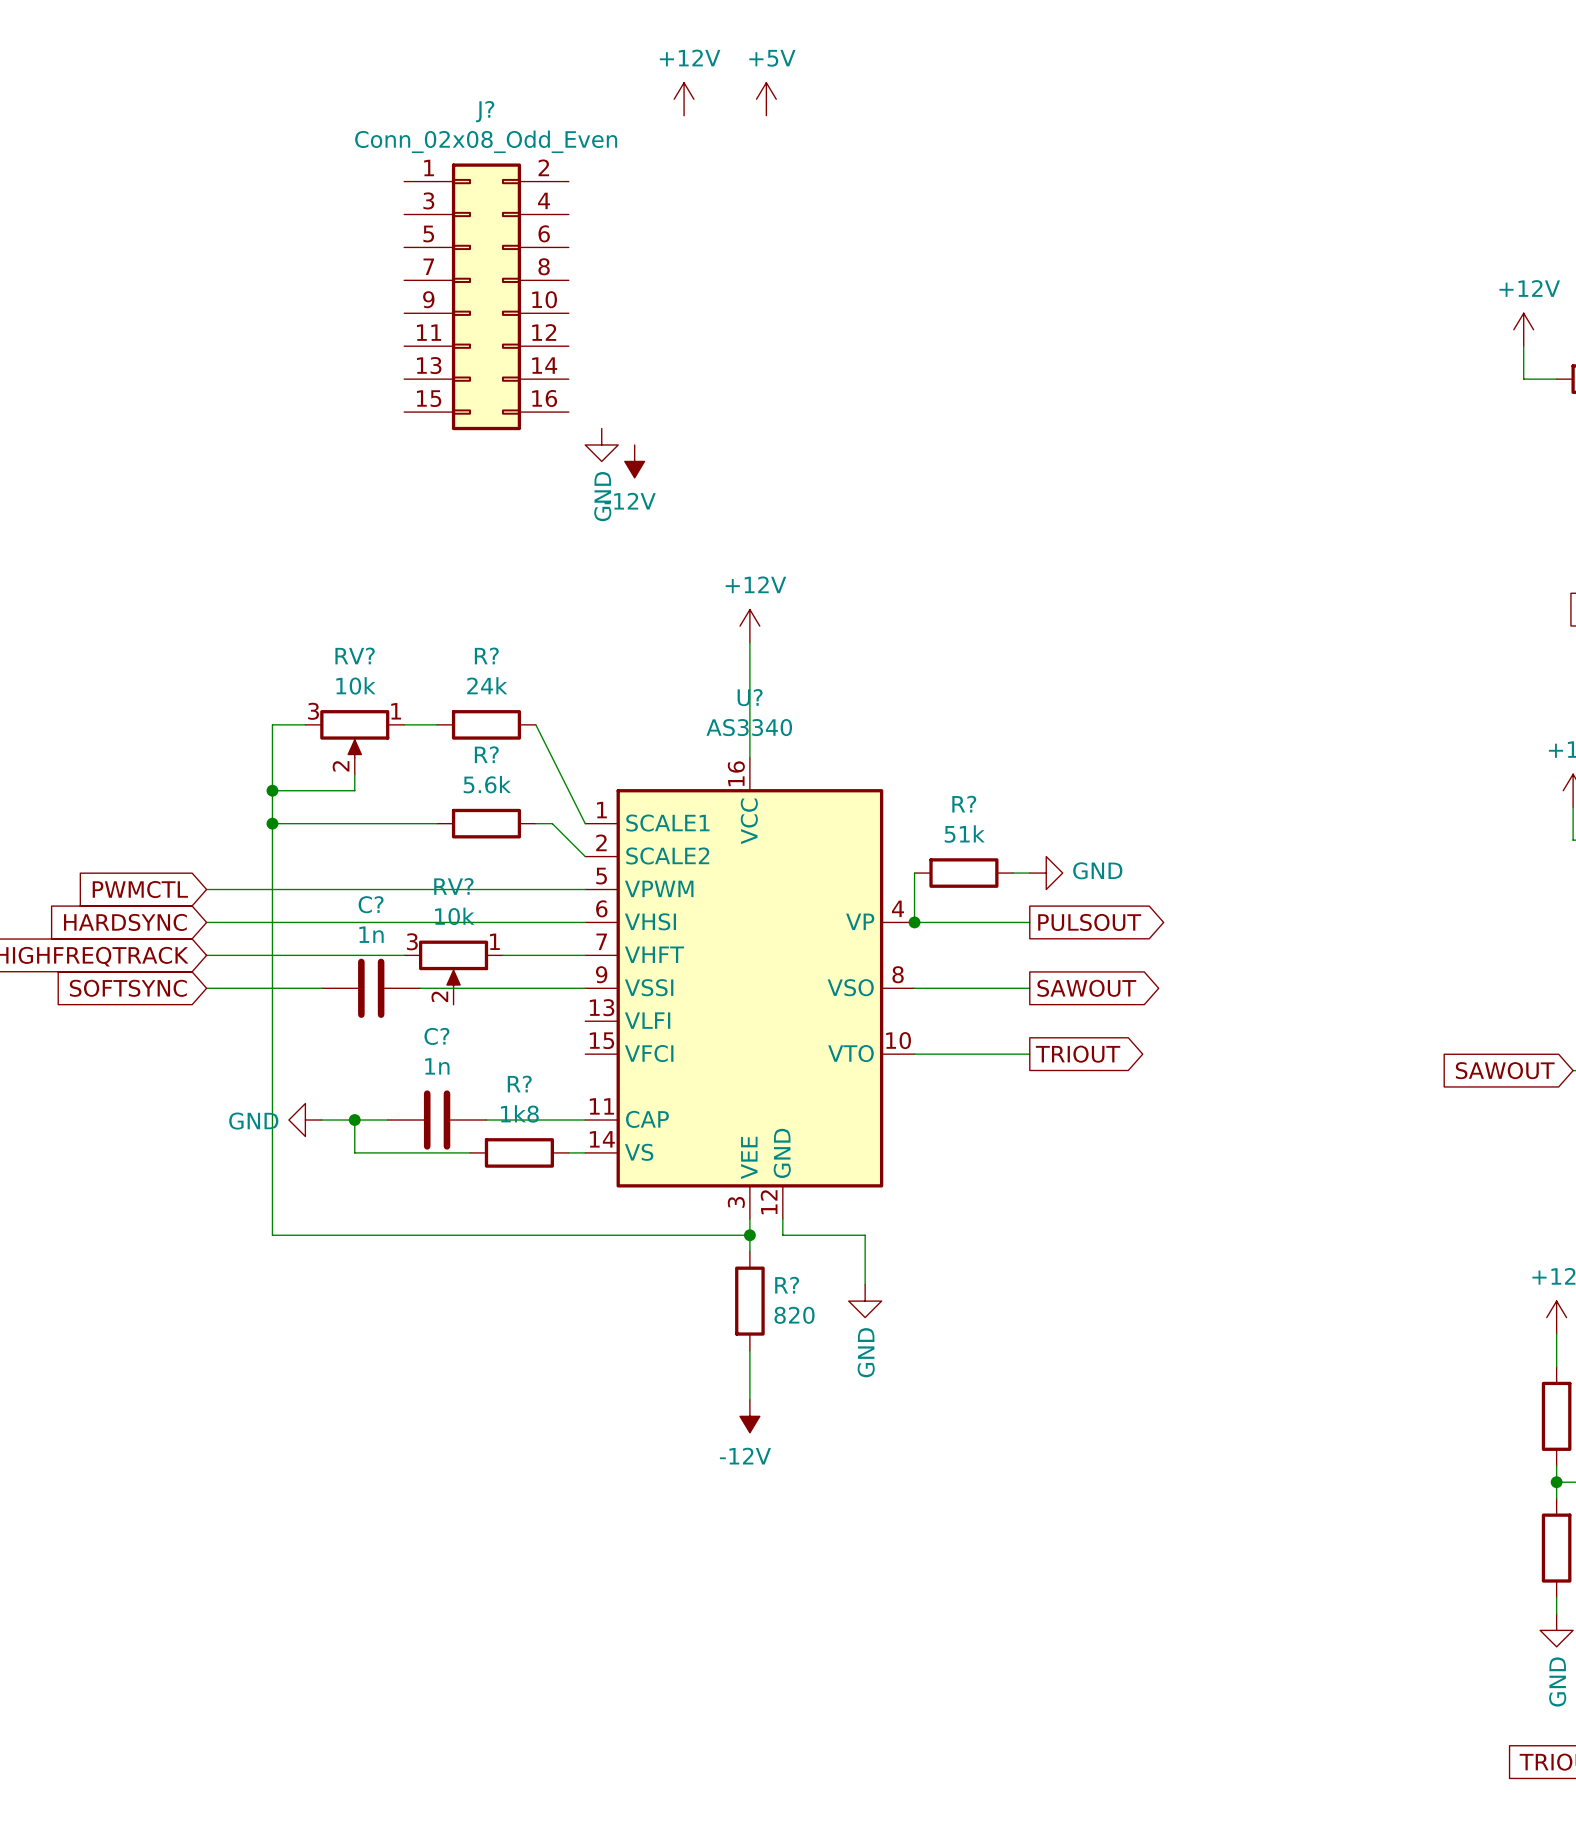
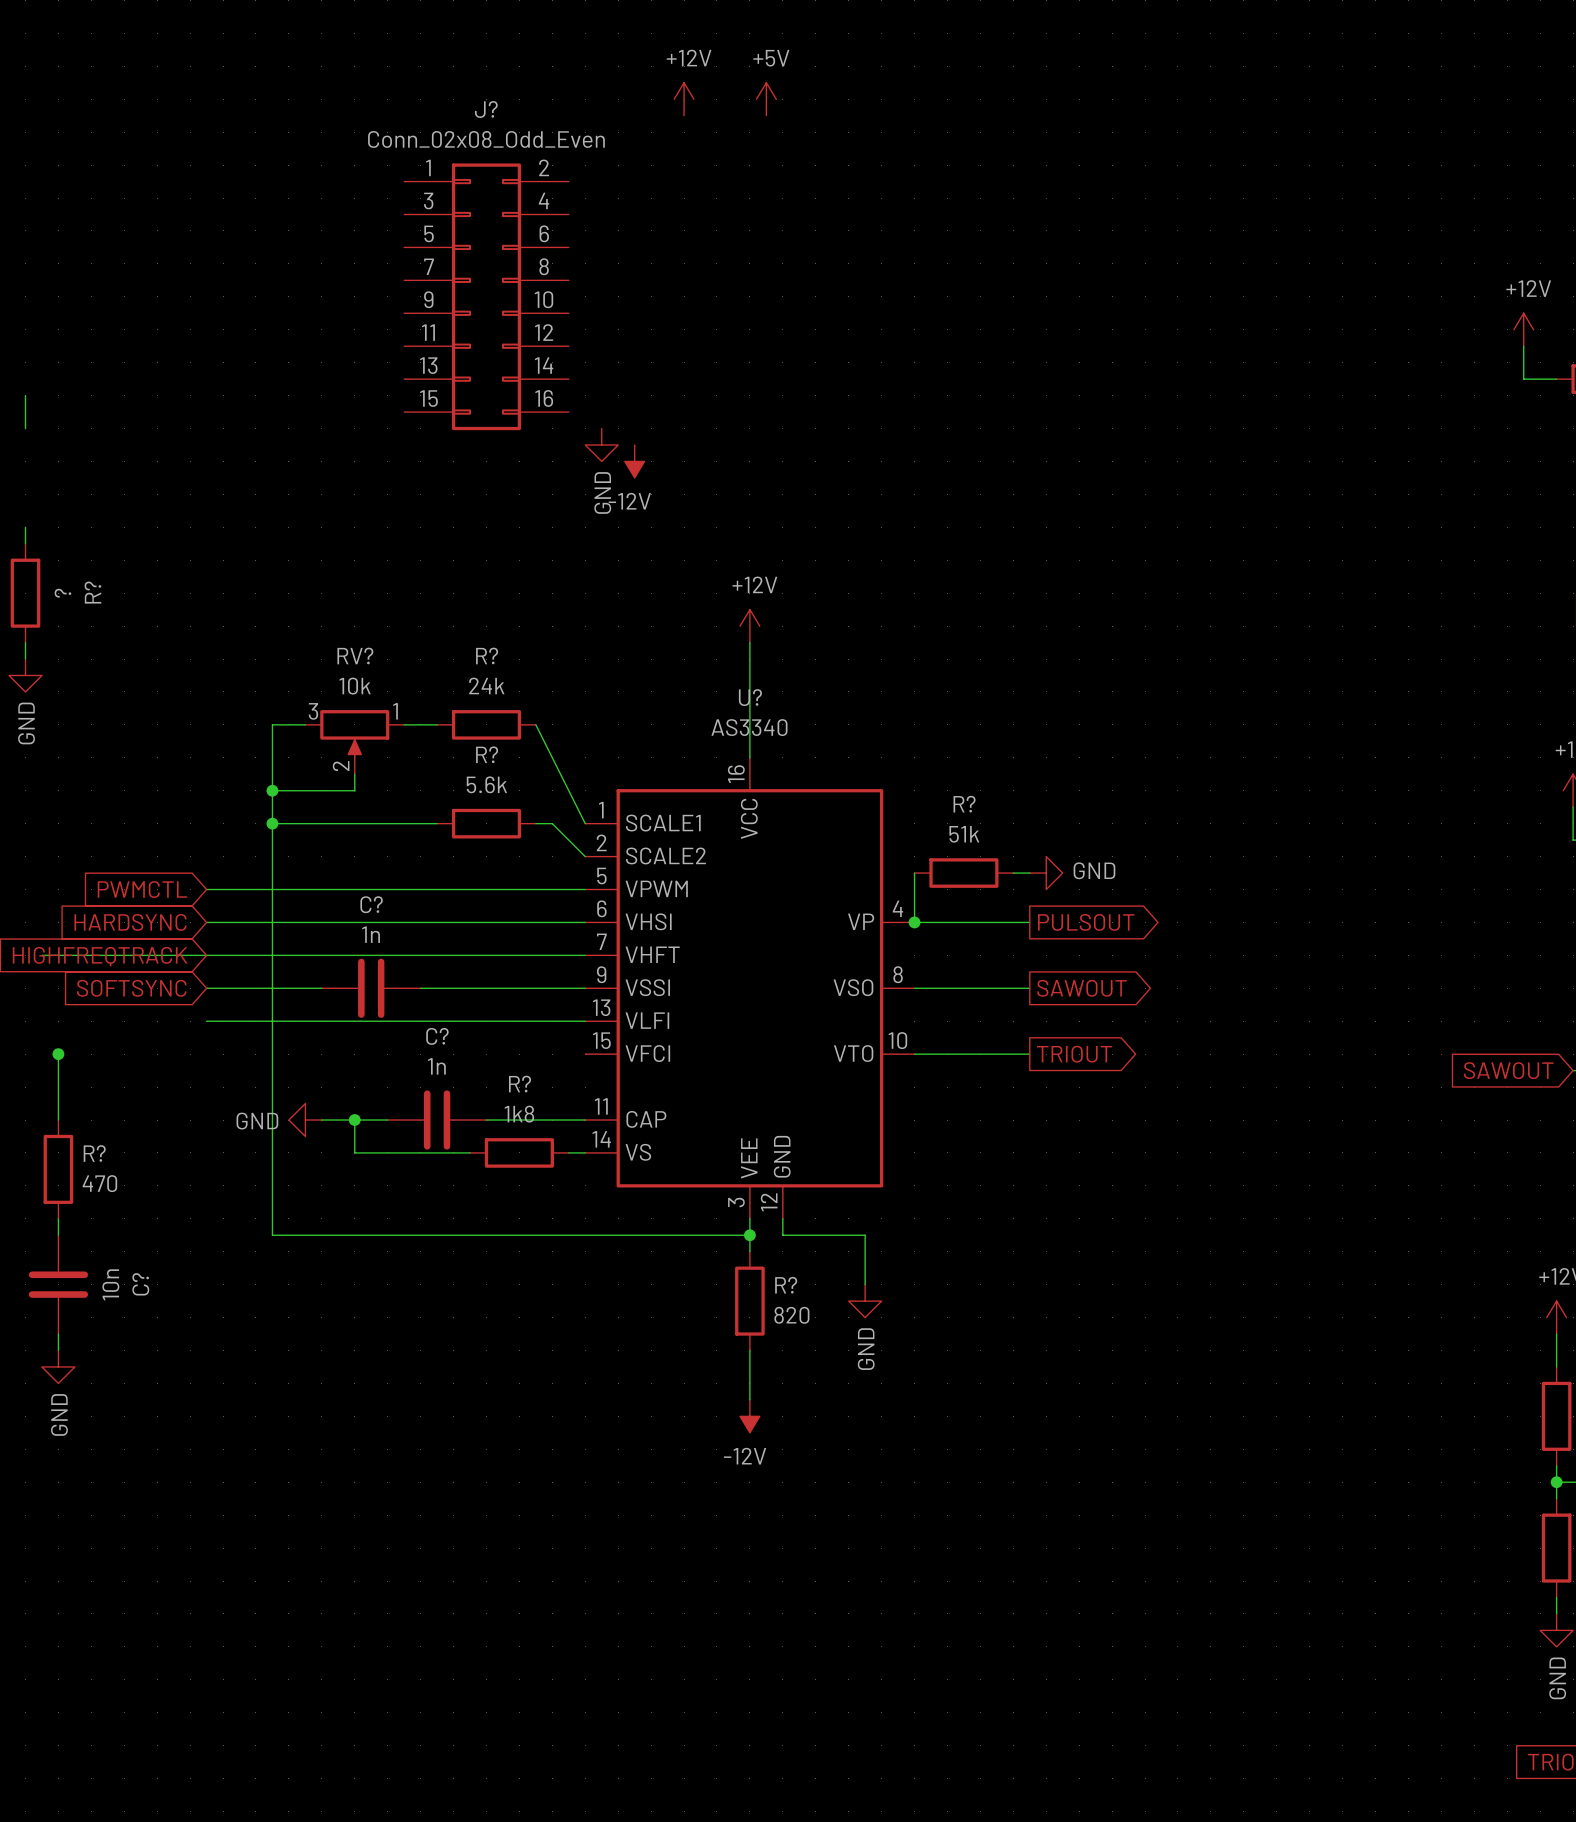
wire: none -> (25, 395) (25, 428)
wire: none -> (25, 527) (25, 543)
R?: none -> ? (25, 593)
wire: none -> (25, 642) (25, 659)
power symbol: none -> GND (25, 675)
wire: none -> (41, 955) (206, 955)
wire: none -> (404, 955) (502, 955)
RV?: 10k (453, 972) -> none
wire: none -> (206, 1021) (585, 1021)
wire: none -> (58, 1054) (58, 1120)
junction: none -> (58, 1054)
R?: none -> 470 (58, 1169)
wire: none -> (58, 1218) (58, 1235)
C?: none -> 10n (58, 1284)
wire: none -> (58, 1334) (58, 1350)
power symbol: none -> GND (58, 1366)

